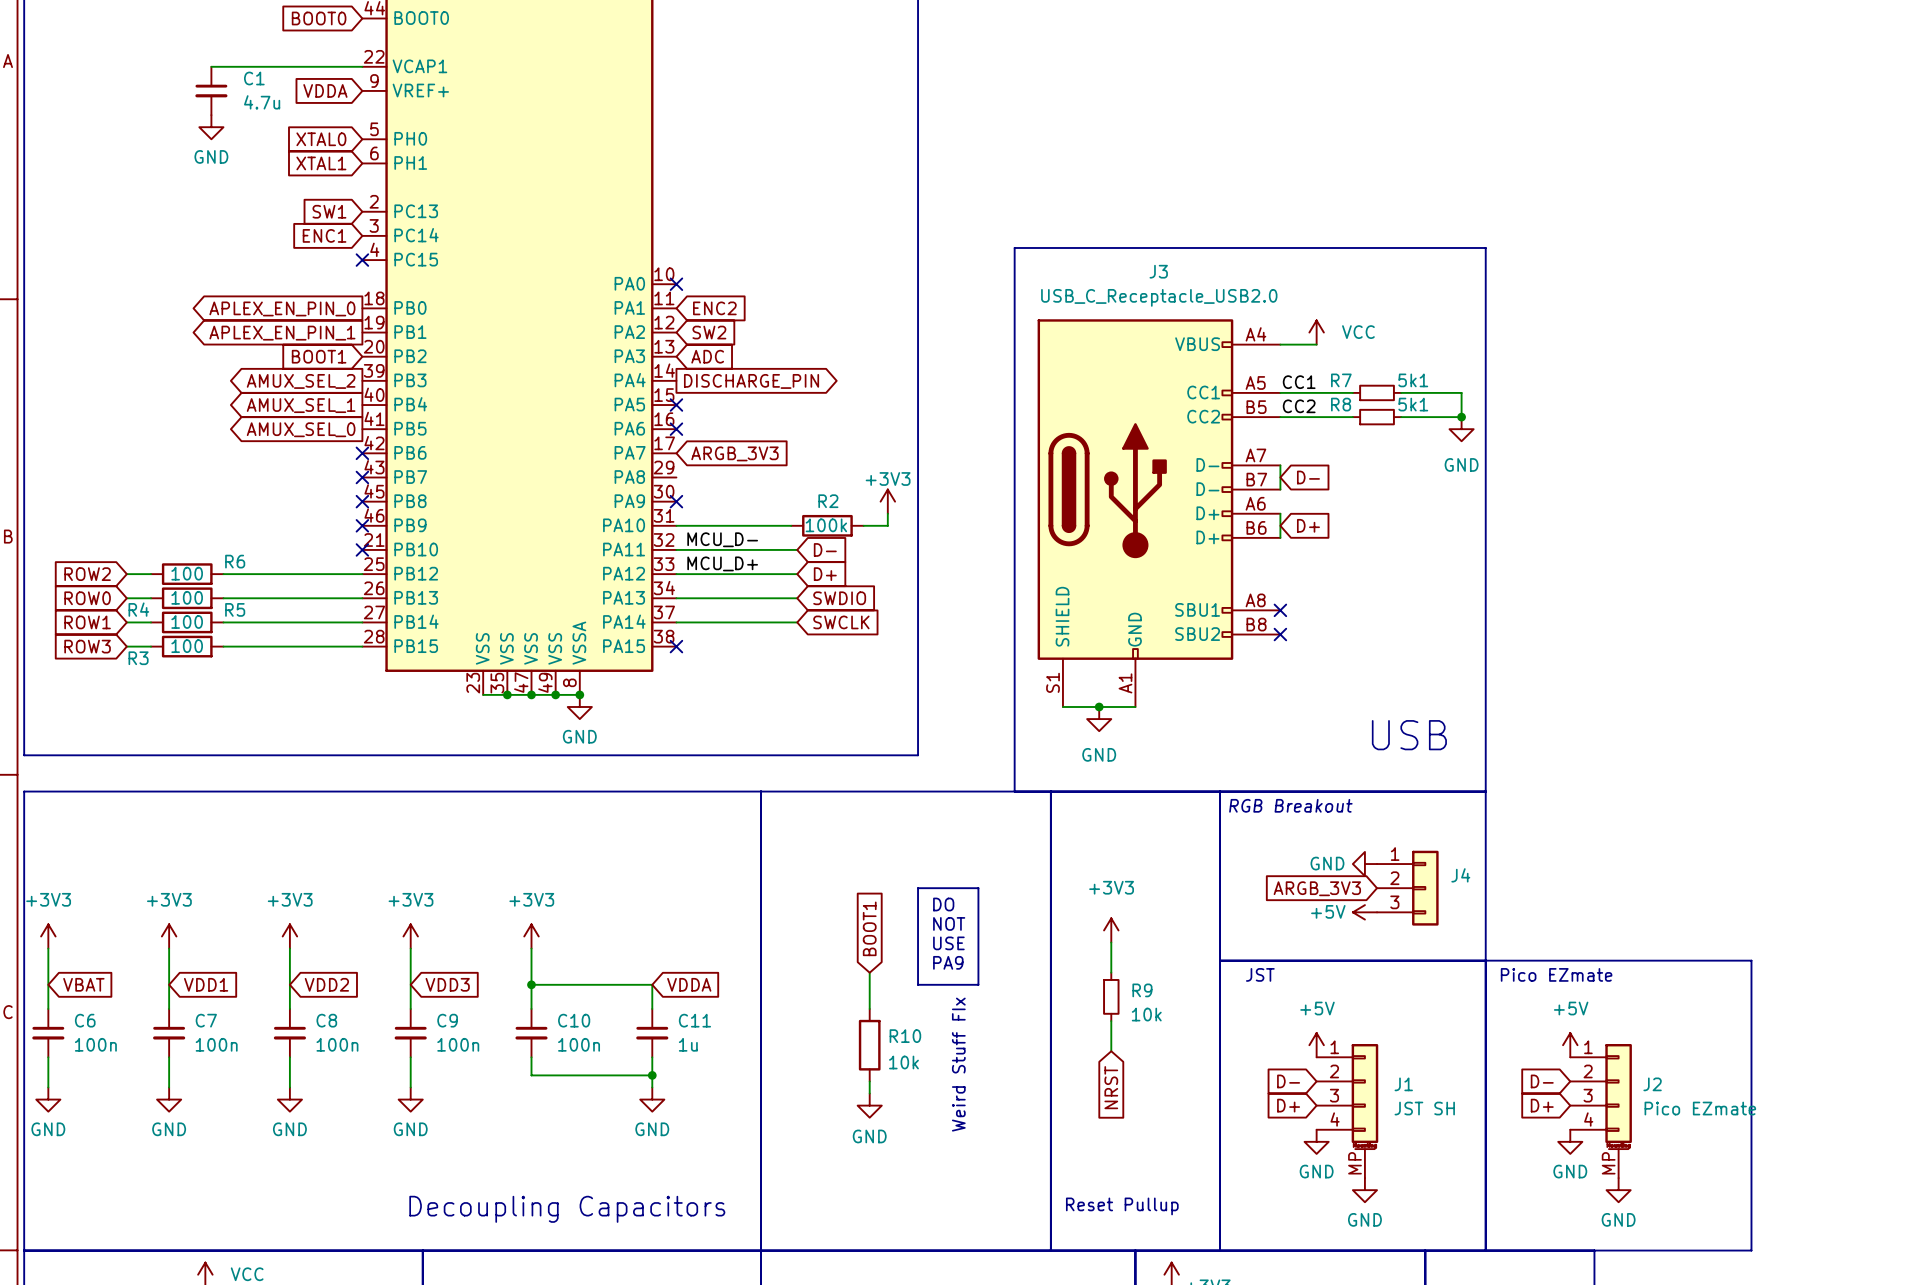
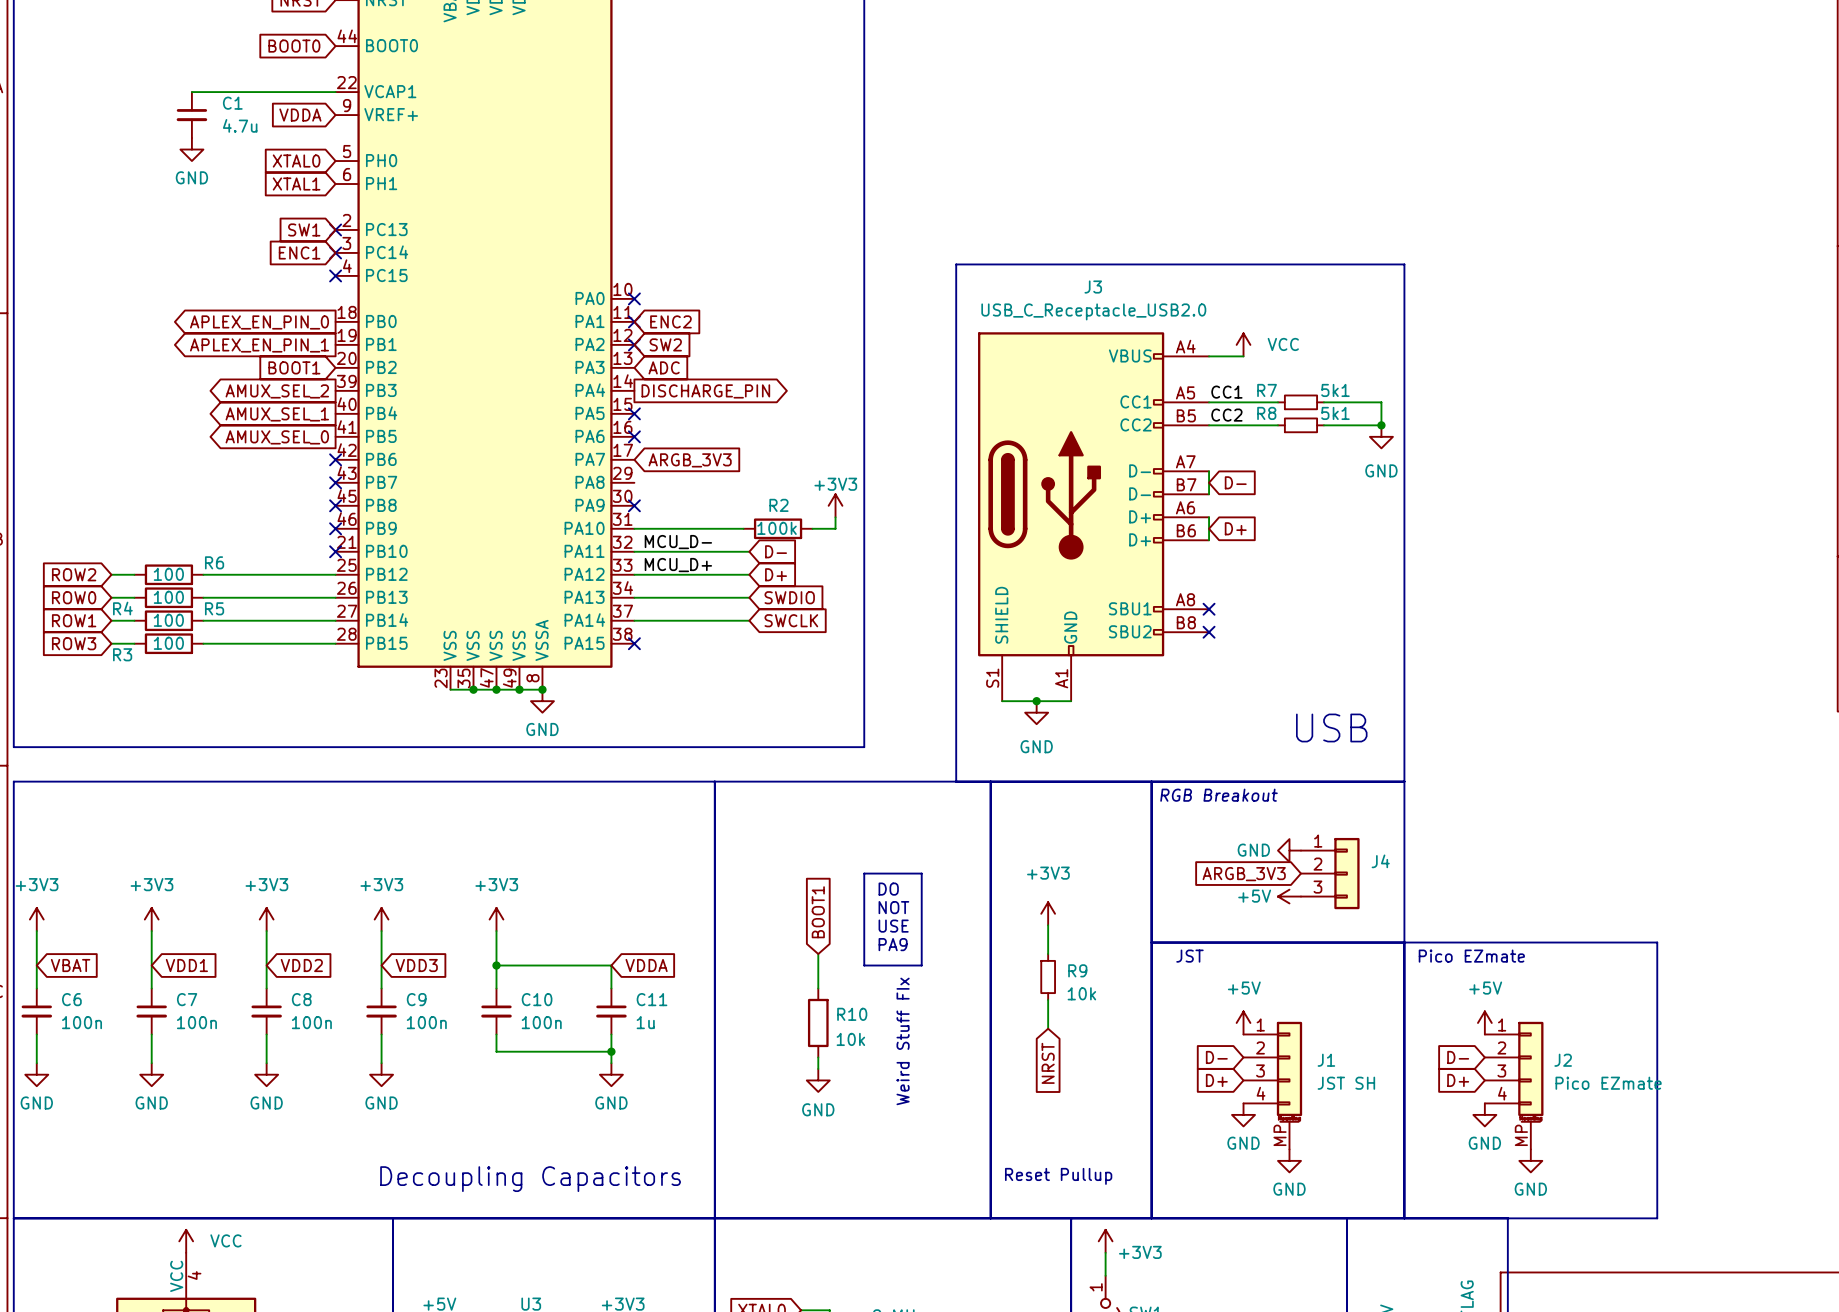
no-connect mark: none -> (335, 229)
no-connect mark: none -> (335, 252)
no-connect mark: none -> (634, 321)
no-connect mark: none -> (634, 344)

